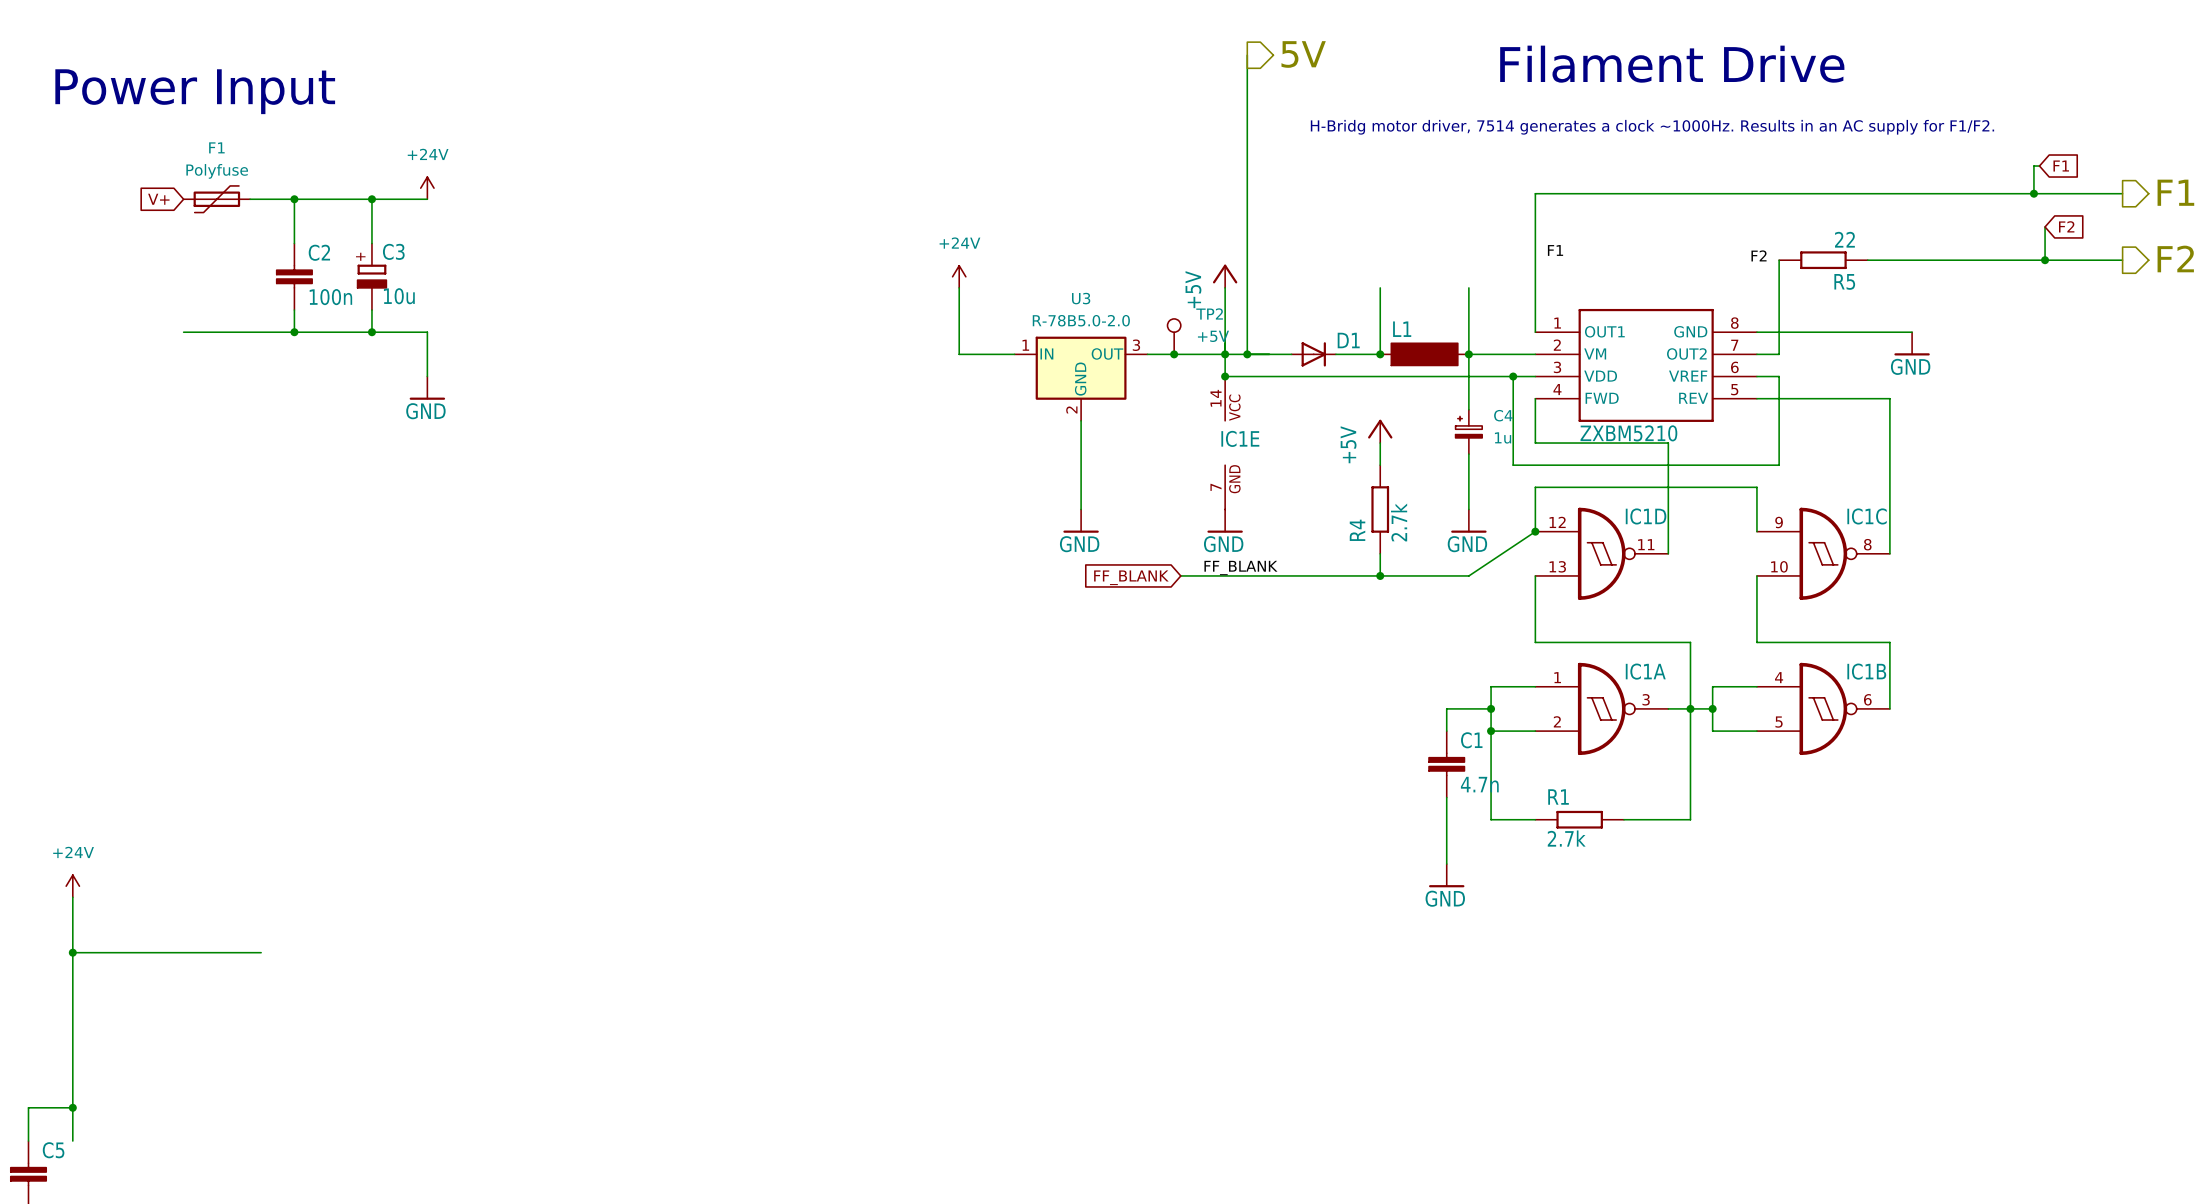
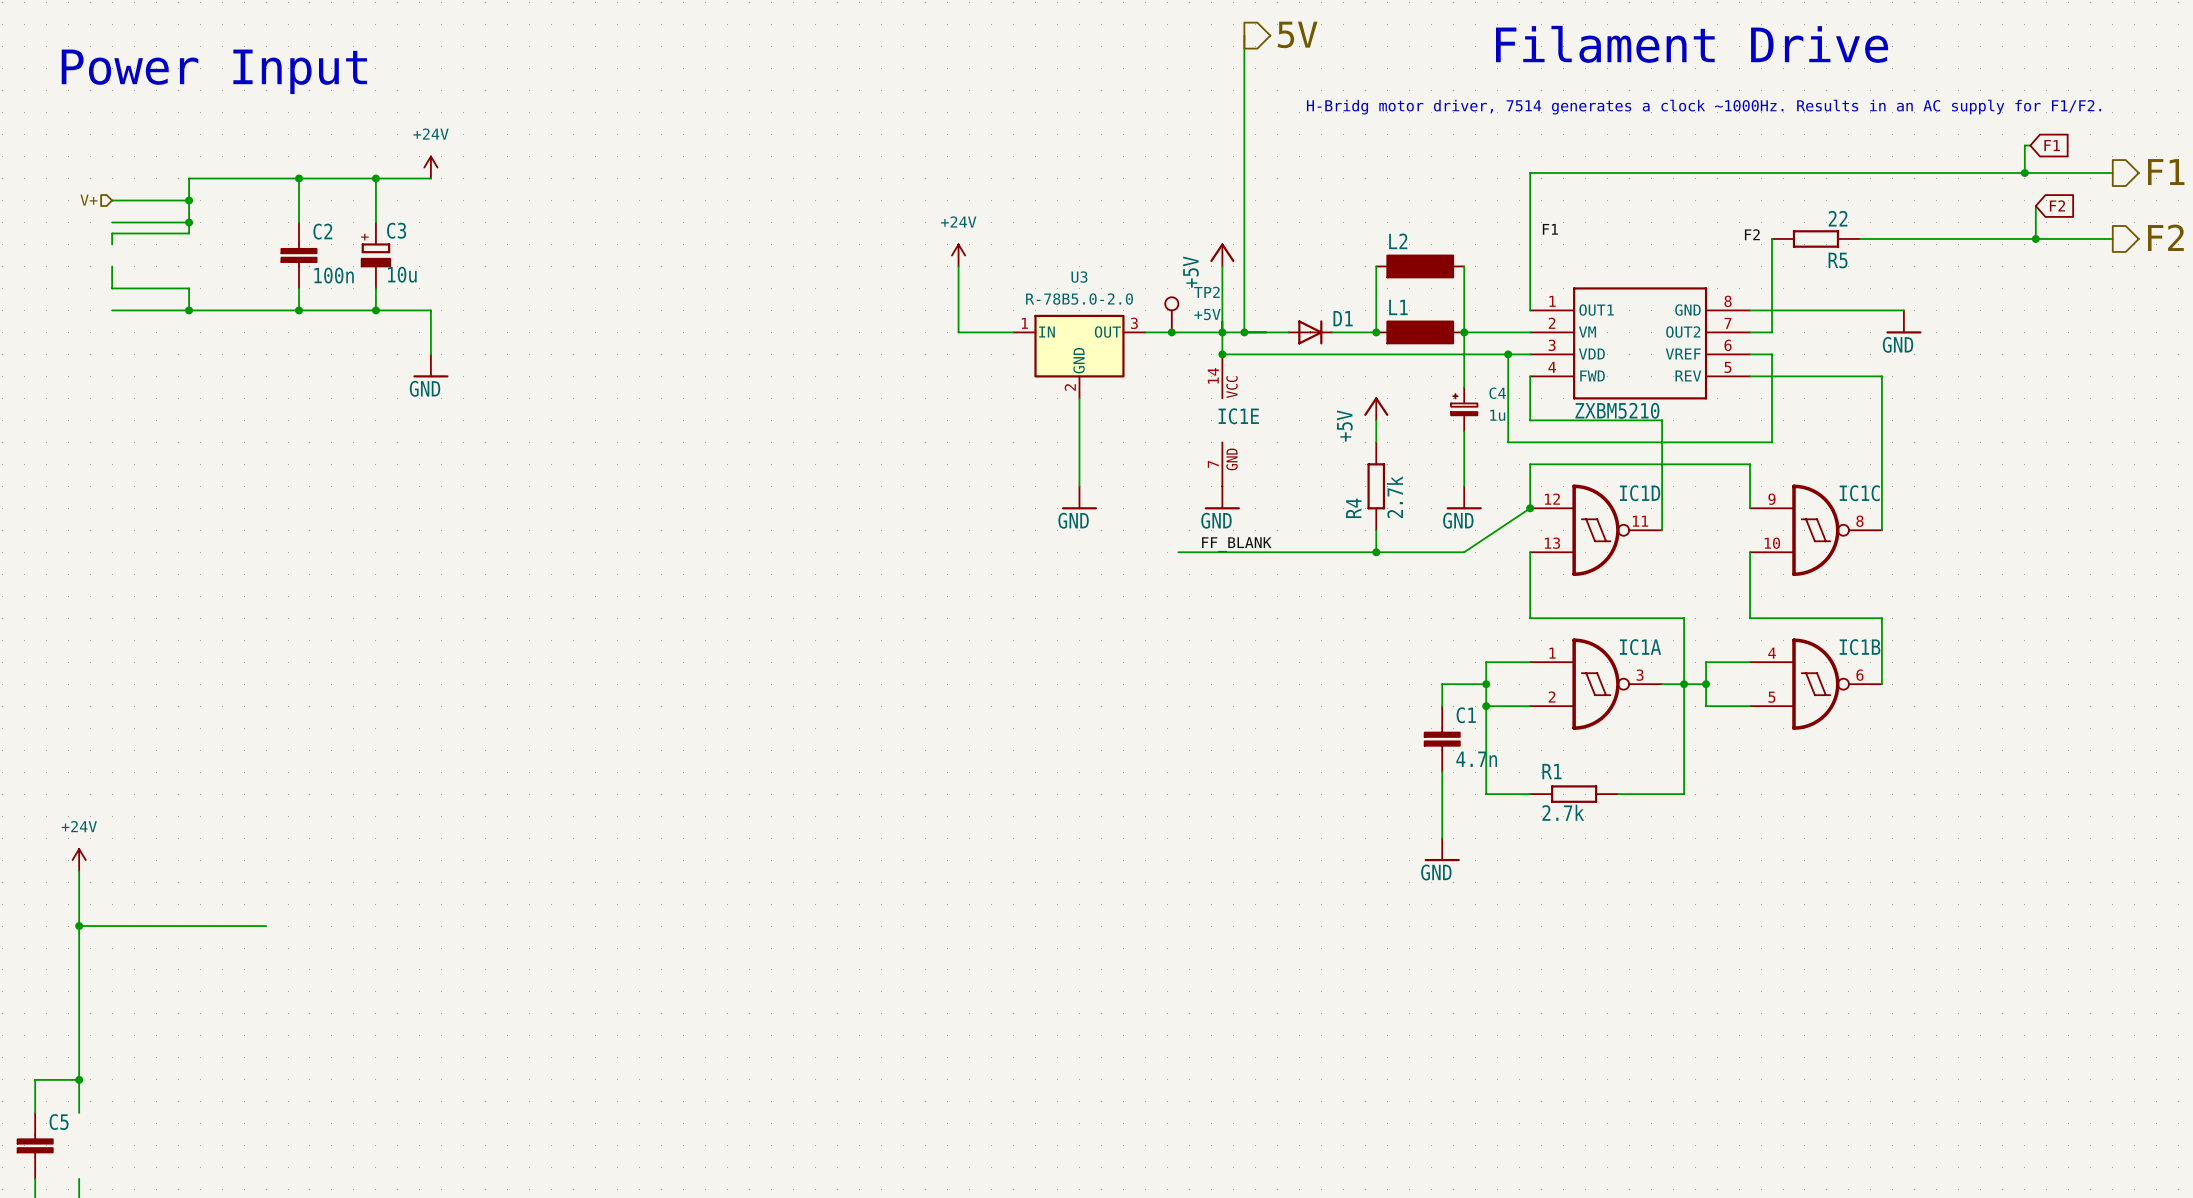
global label: V+ (158, 199) -> none
F1: Polyfuse (216, 199) -> none
wire: none -> (255, 178) (189, 178) (189, 233) (112, 233) (112, 244)
hierarchical label: none -> V+ (88, 200)
wire: none -> (112, 200) (189, 200)
junction: none -> (189, 200)
wire: none -> (112, 222) (189, 222)
junction: none -> (189, 222)
wire: none -> (112, 266) (112, 288) (189, 288) (189, 310) (112, 310)
L2: none -> (1420, 266)
junction: none -> (189, 310)
global label: FF_BLANK (1131, 577) -> none

